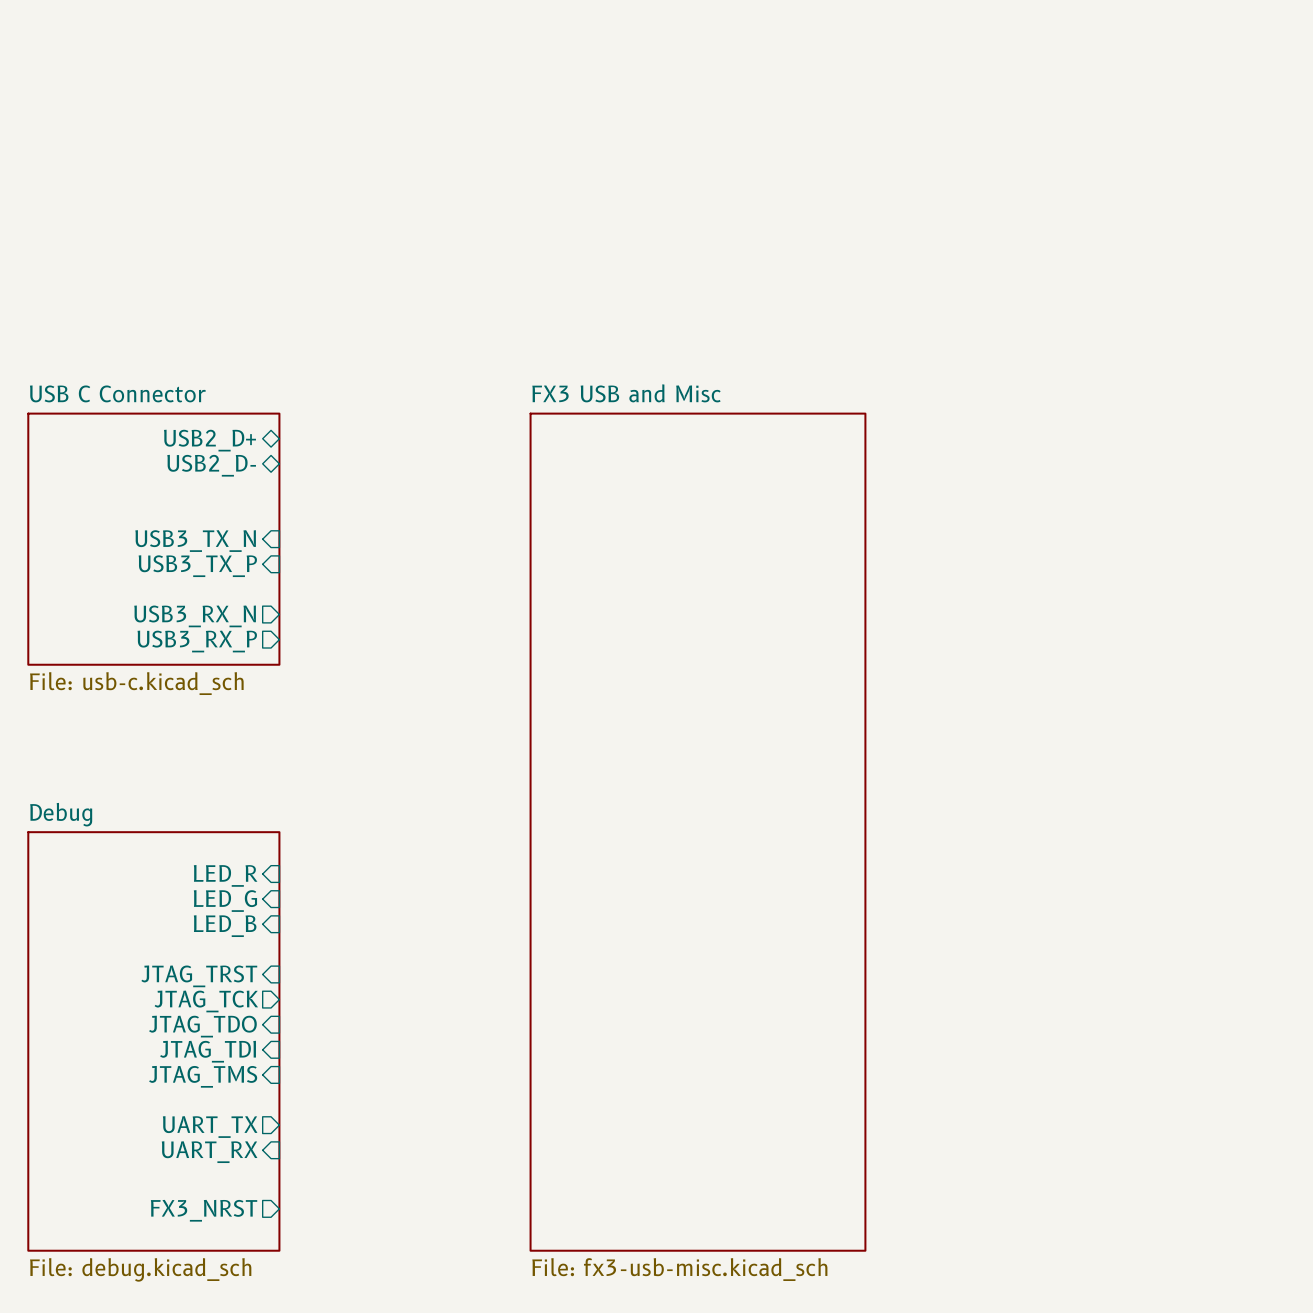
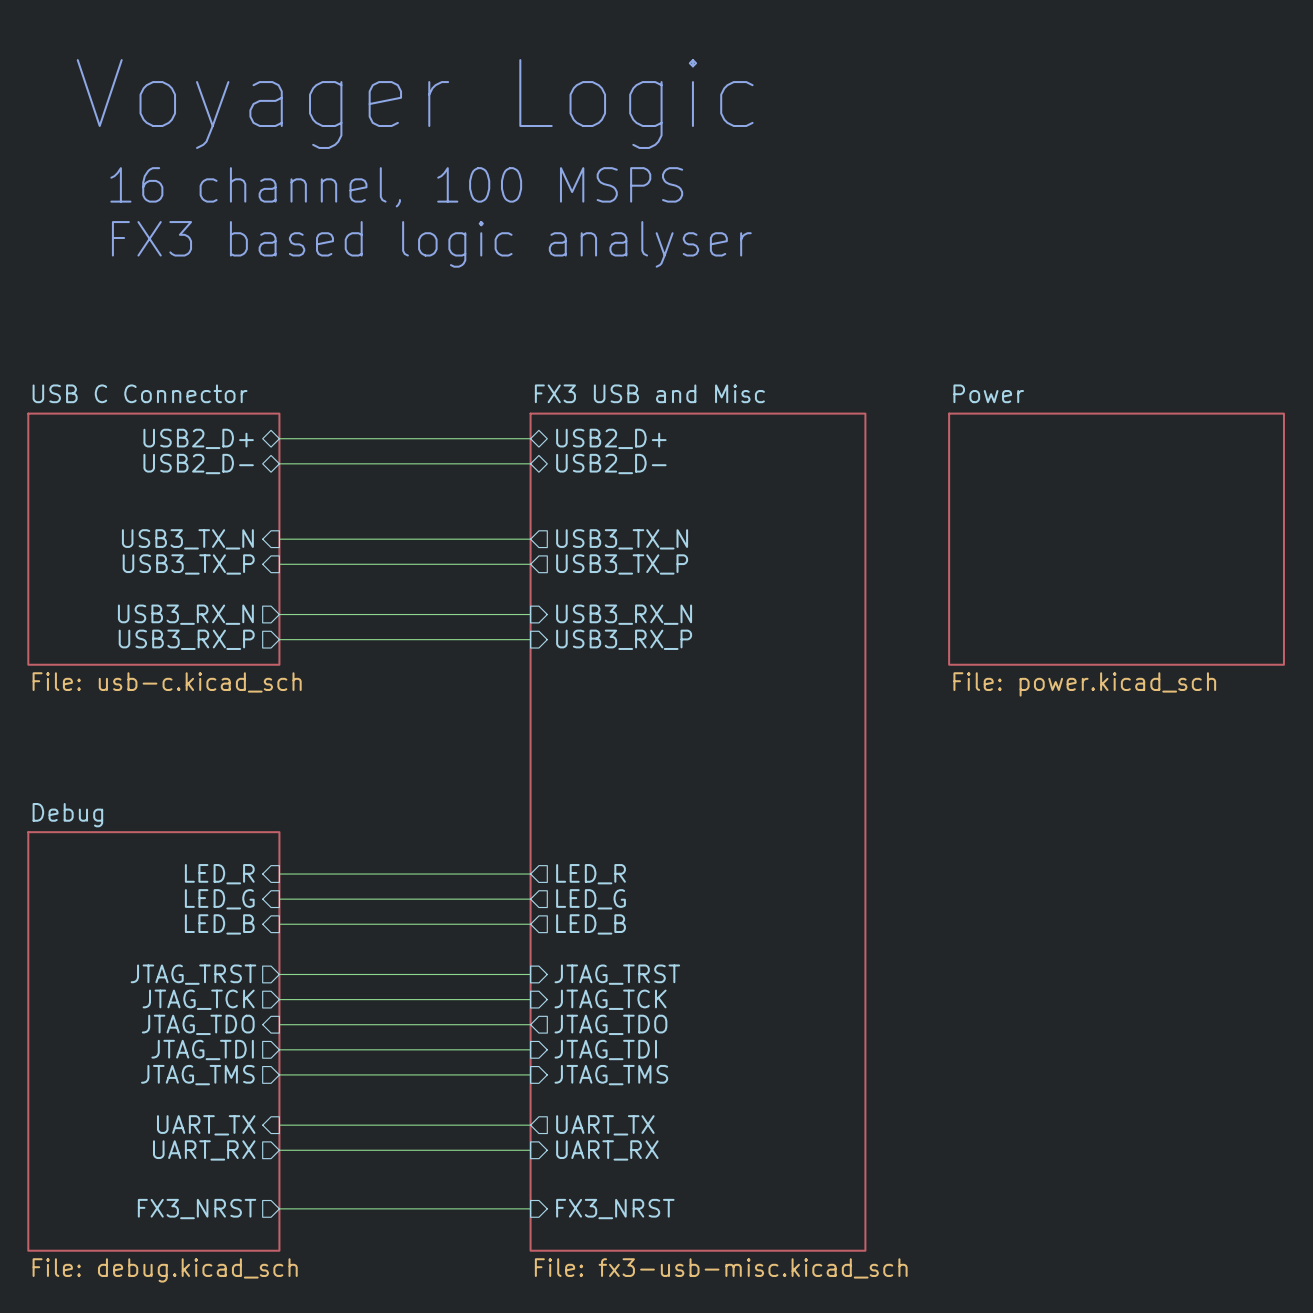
text: none -> Voyager Logic (415, 104)
text: none -> 16 channel, 100 MSPS (396, 187)
text: none -> FX3 based logic analyser (431, 244)
wire: none -> (279, 438) (530, 438)
sheet pin: none -> USB2_D+ (611, 438)
wire: none -> (279, 463) (530, 463)
sheet pin: none -> USB2_D- (611, 464)
wire: none -> (279, 539) (530, 539)
sheet Power: none -> File: power.kicad_sch (1116, 539)
sheet pin: none -> USB3_TX_N (622, 539)
wire: none -> (279, 564) (530, 564)
sheet pin: none -> USB3_TX_P (622, 564)
wire: none -> (279, 614) (530, 614)
sheet pin: none -> USB3_RX_N (624, 614)
wire: none -> (279, 639) (530, 639)
sheet pin: none -> USB3_RX_P (624, 639)
wire: none -> (279, 874) (530, 874)
sheet pin: none -> LED_R (591, 874)
wire: none -> (279, 899) (530, 899)
sheet pin: none -> LED_G (591, 899)
wire: none -> (279, 924) (530, 924)
sheet pin: none -> LED_B (591, 924)
wire: none -> (279, 974) (530, 974)
sheet pin shape: input (199, 976) -> output (193, 974)
sheet pin: none -> JTAG_TRST (617, 974)
wire: none -> (279, 999) (530, 999)
sheet pin: none -> JTAG_TCK (610, 999)
wire: none -> (279, 1024) (530, 1024)
sheet pin: none -> JTAG_TDO (610, 1024)
wire: none -> (279, 1049) (530, 1049)
sheet pin shape: input (208, 1051) -> output (202, 1049)
sheet pin: none -> JTAG_TDI (605, 1049)
wire: none -> (279, 1074) (530, 1074)
sheet pin shape: input (203, 1076) -> output (197, 1075)
sheet pin: none -> JTAG_TMS (611, 1075)
wire: none -> (279, 1125) (530, 1125)
sheet pin shape: output (210, 1127) -> input (206, 1125)
sheet pin: none -> UART_TX (605, 1125)
wire: none -> (279, 1150) (530, 1150)
sheet pin shape: input (209, 1152) -> output (204, 1150)
sheet pin: none -> UART_RX (607, 1150)
wire: none -> (279, 1208) (530, 1208)
sheet pin: none -> FX3_NRST (615, 1209)

